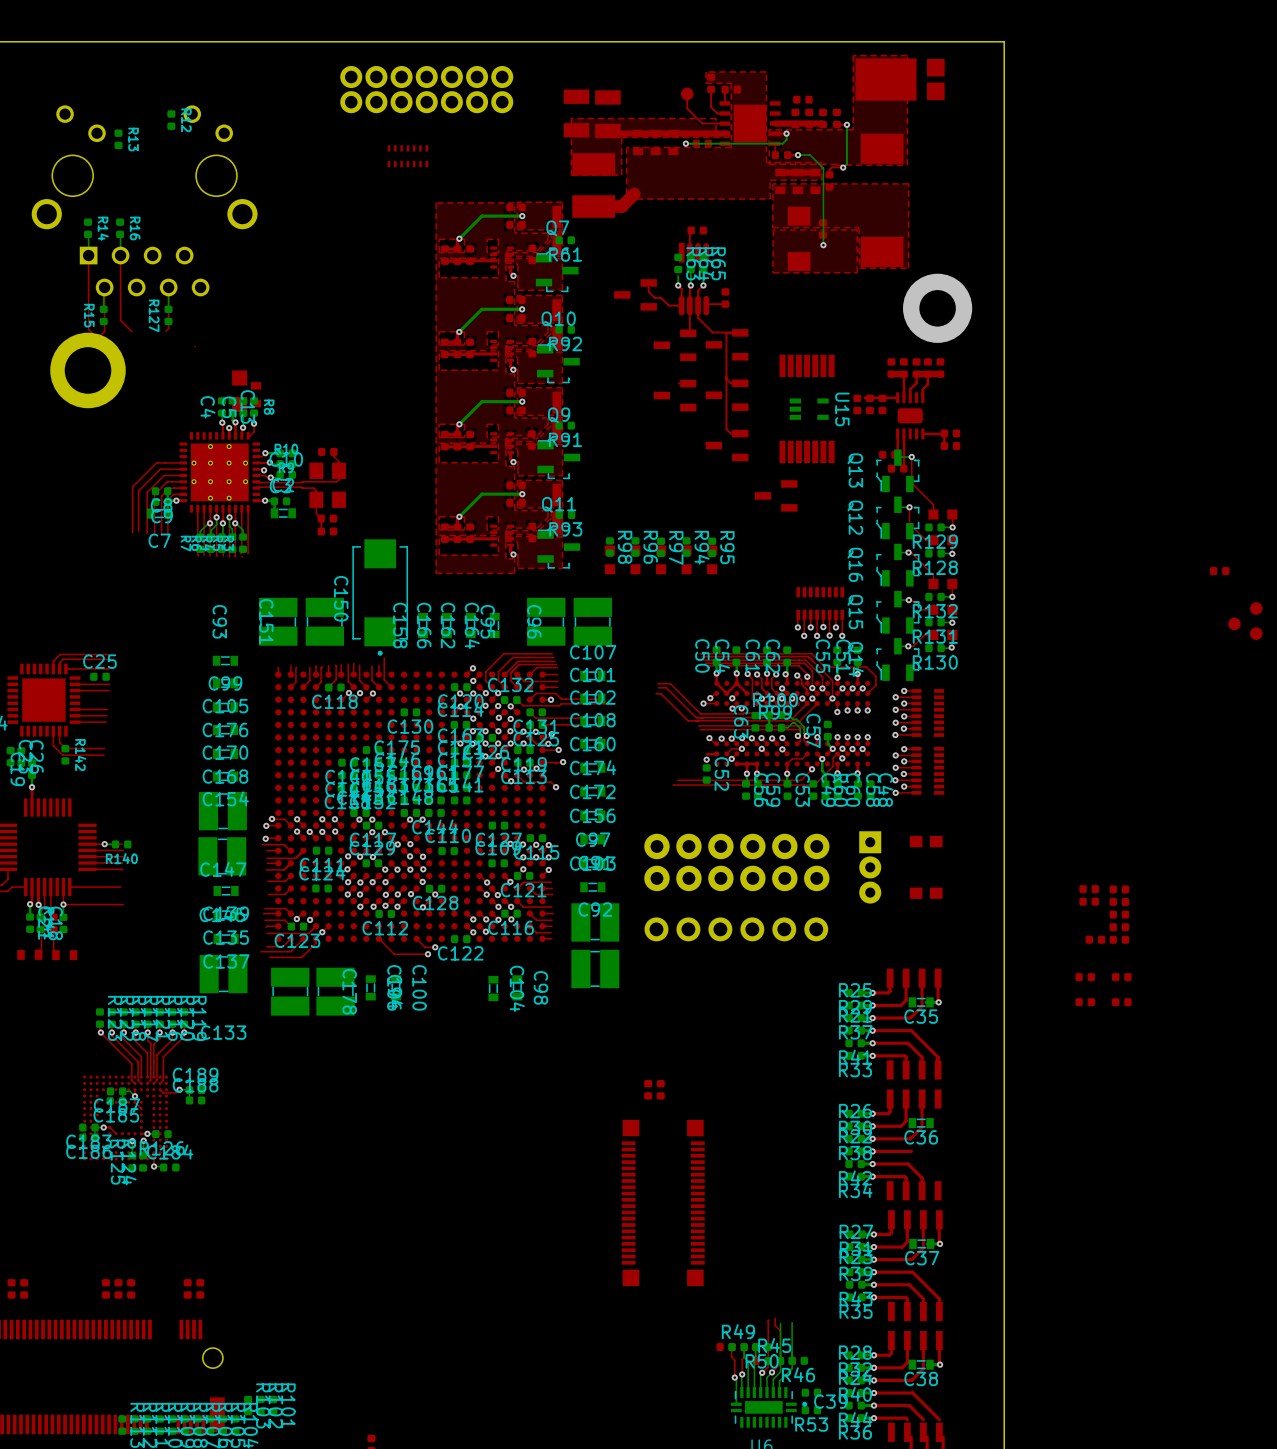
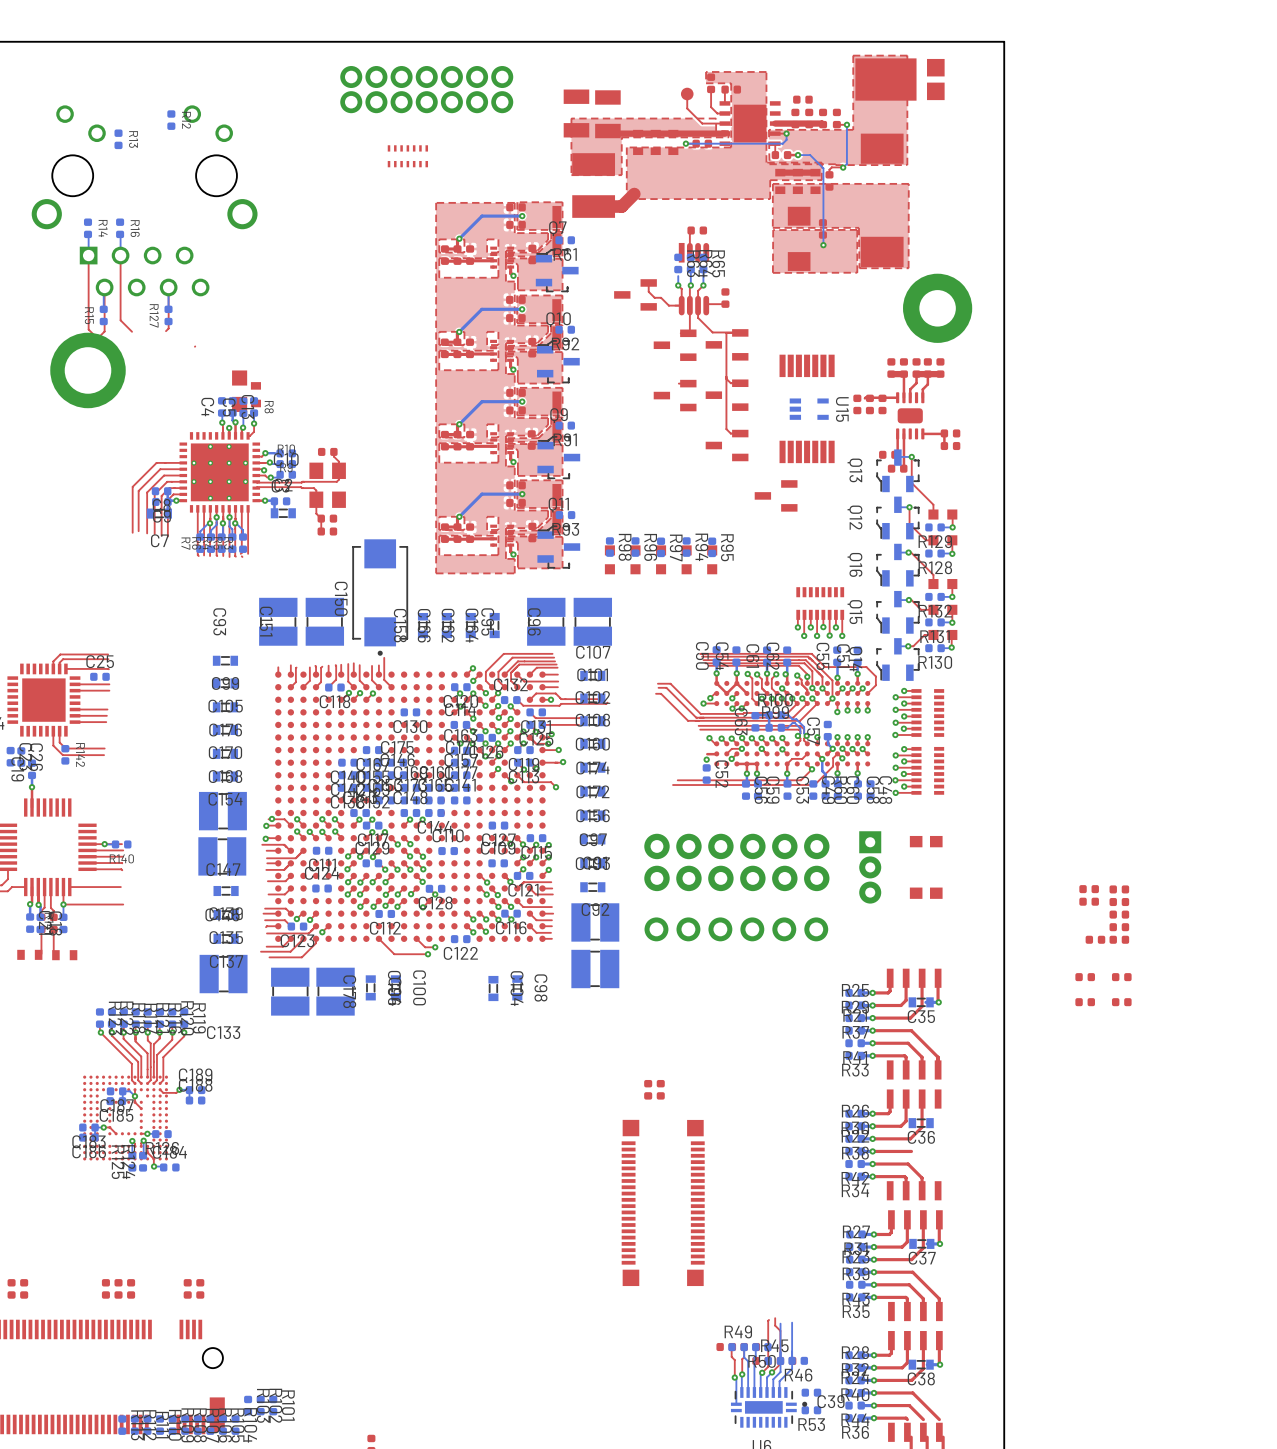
part: (1219, 571) -> none
part: (1256, 608) -> none
part: (1234, 623) -> none
part: (1256, 633) -> none

